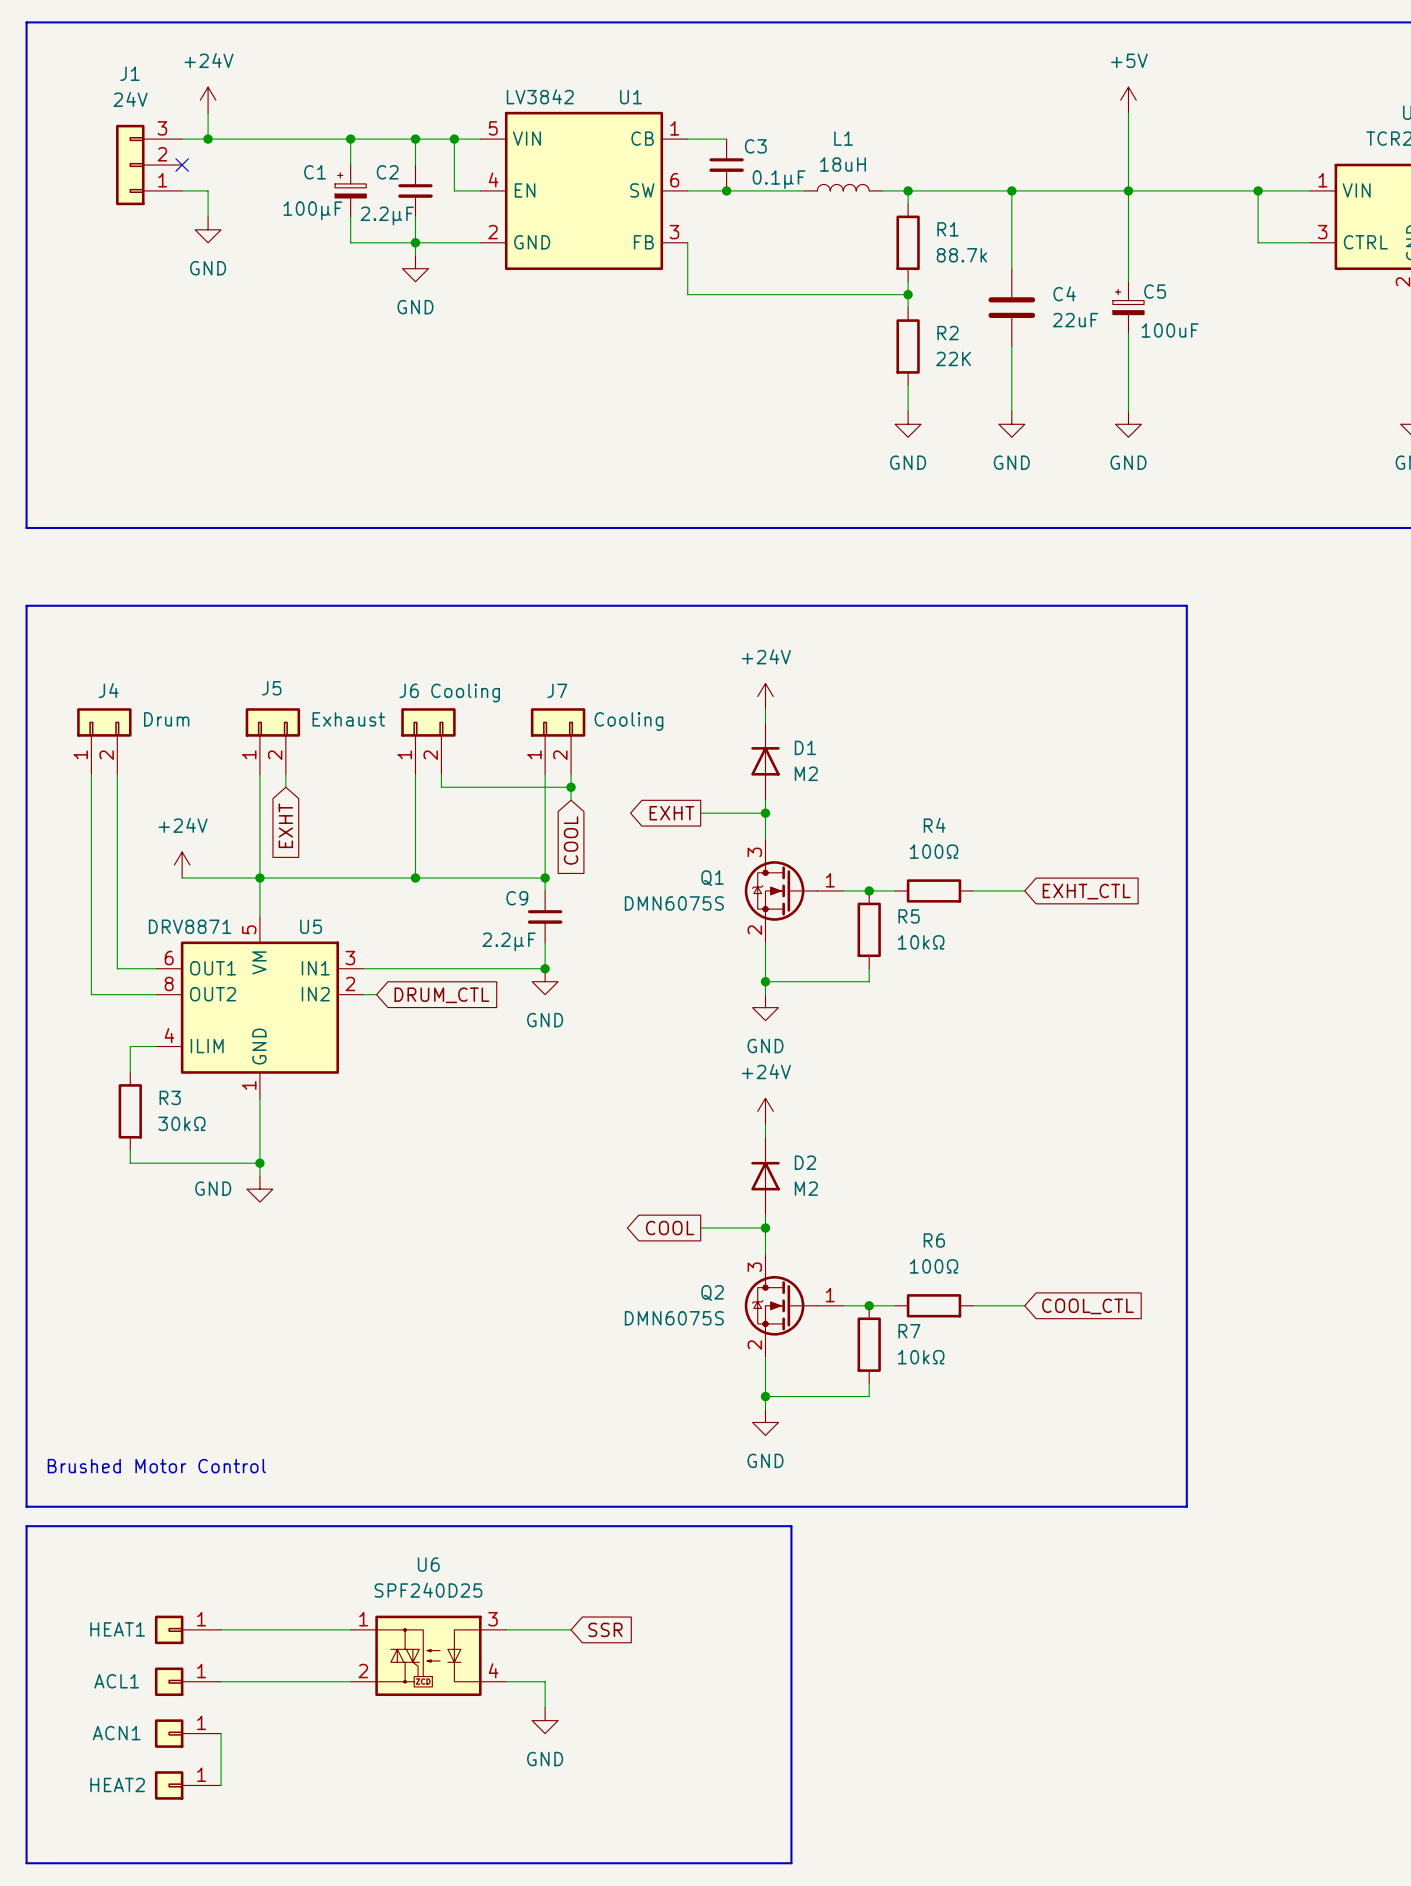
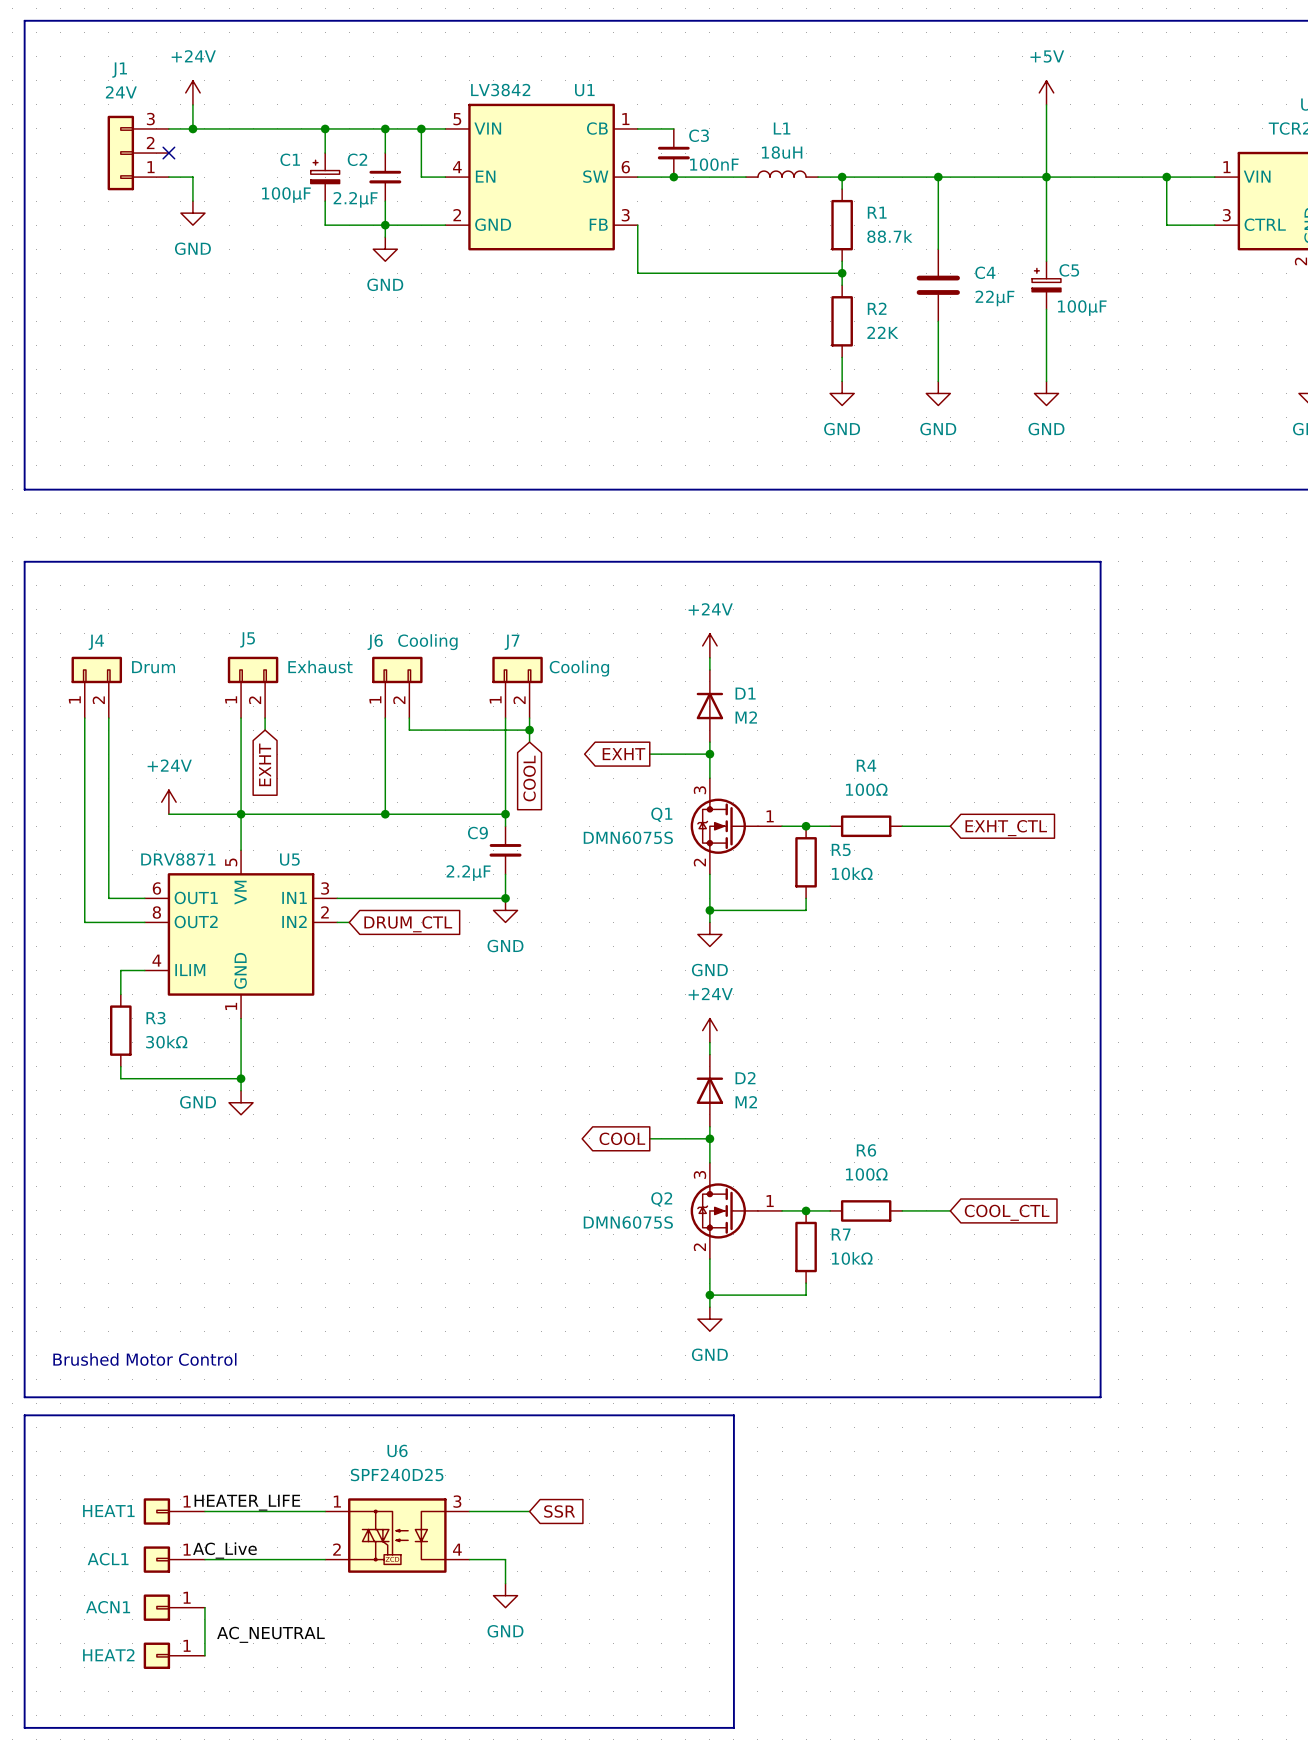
C3 value: 0.1µF (779, 179) -> 100nF (714, 164)
C4 value: 22uF (1075, 320) -> 22µF (994, 298)
C5 value: 100uF (1170, 330) -> 100µF (1082, 308)
label: none -> HEATER_LIFE (247, 1502)
label: none -> AC_Live (224, 1550)
label: none -> AC_NEUTRAL (270, 1634)

